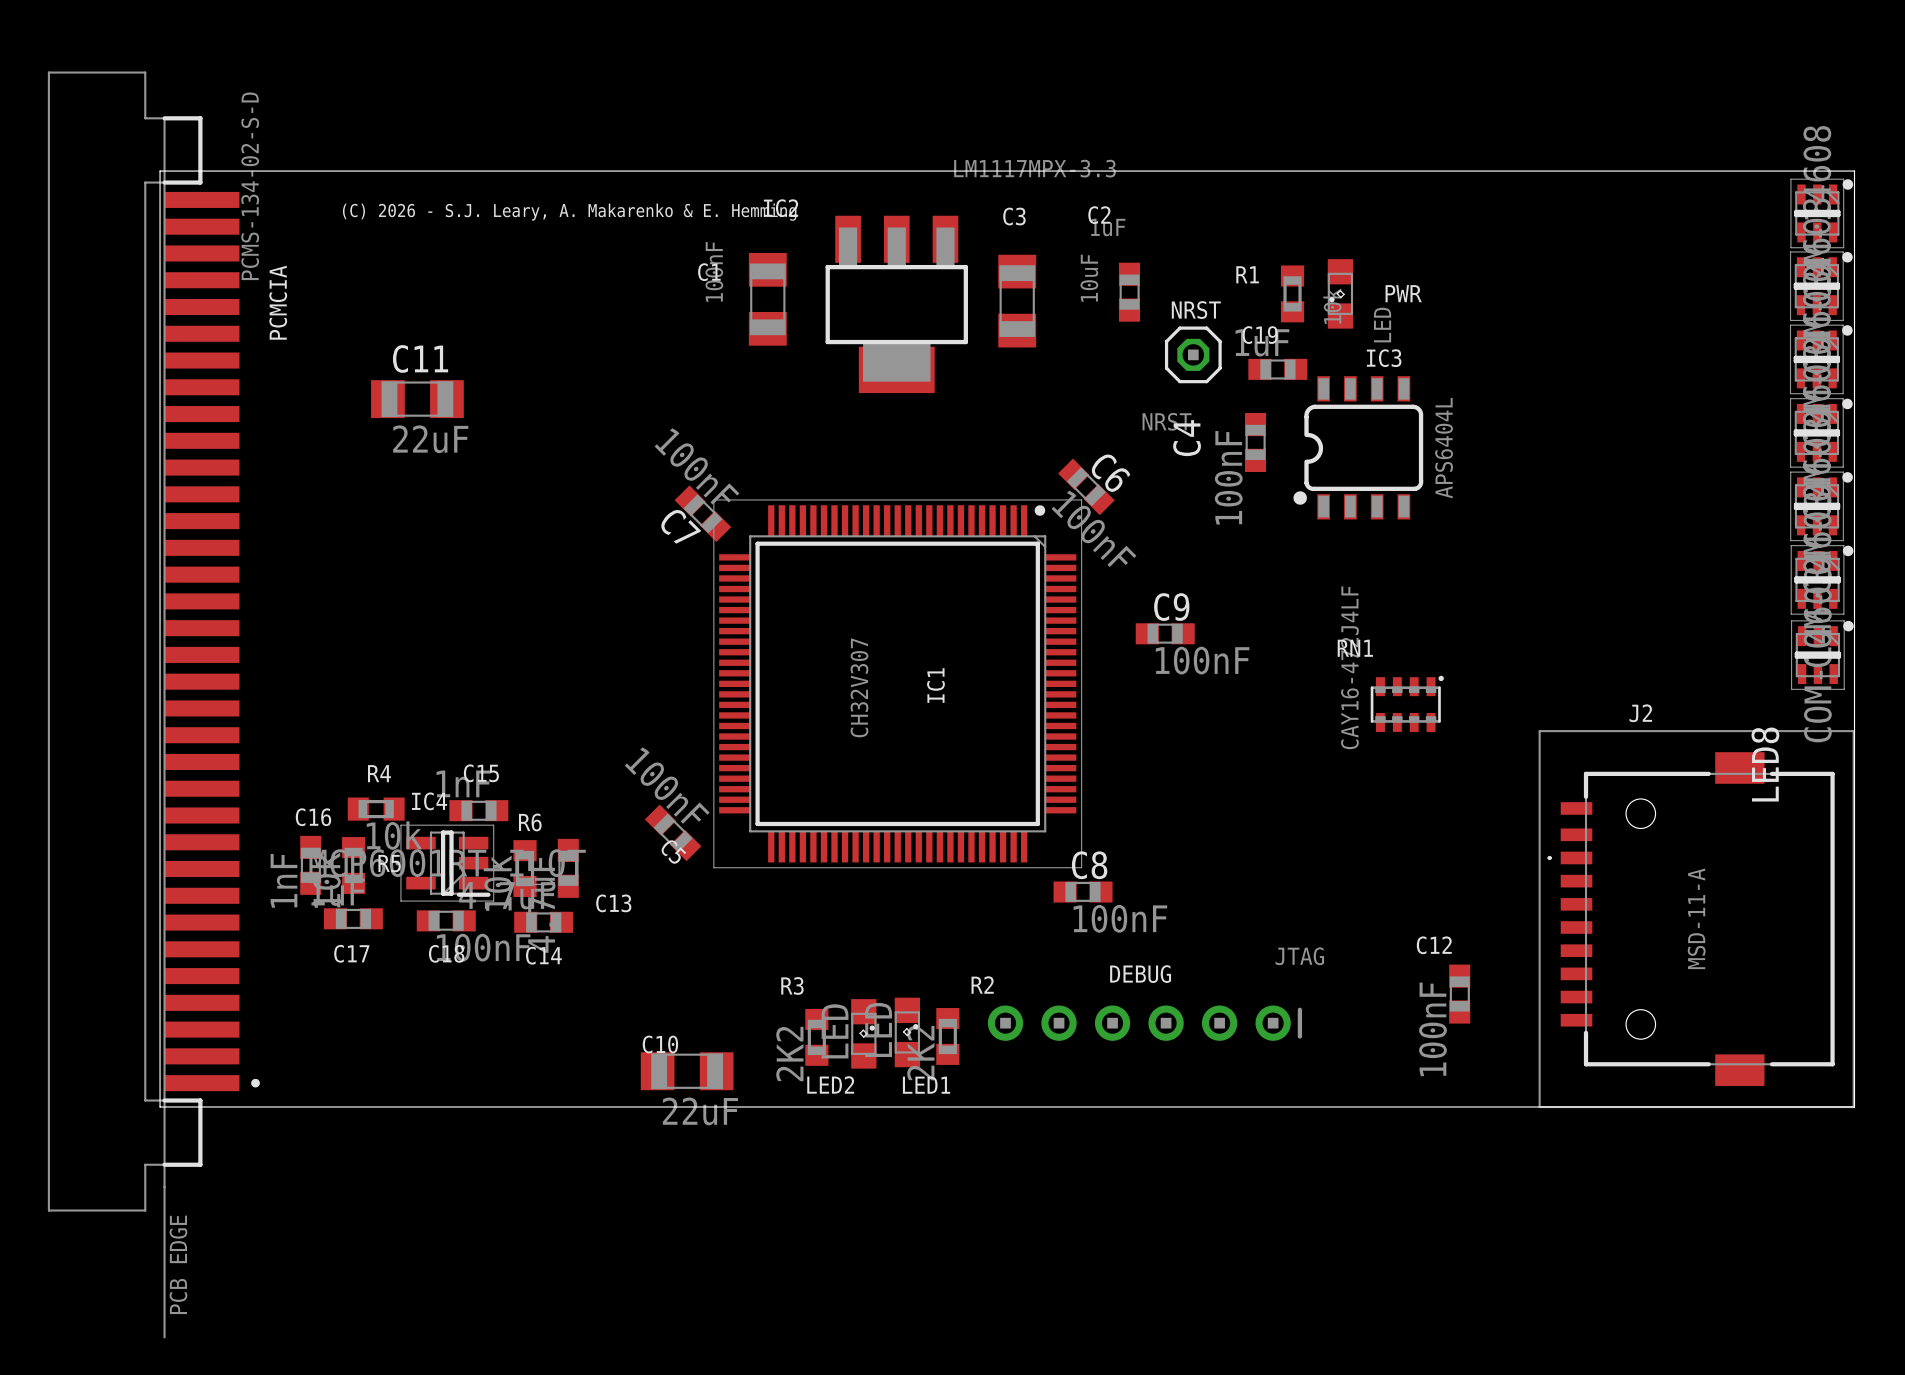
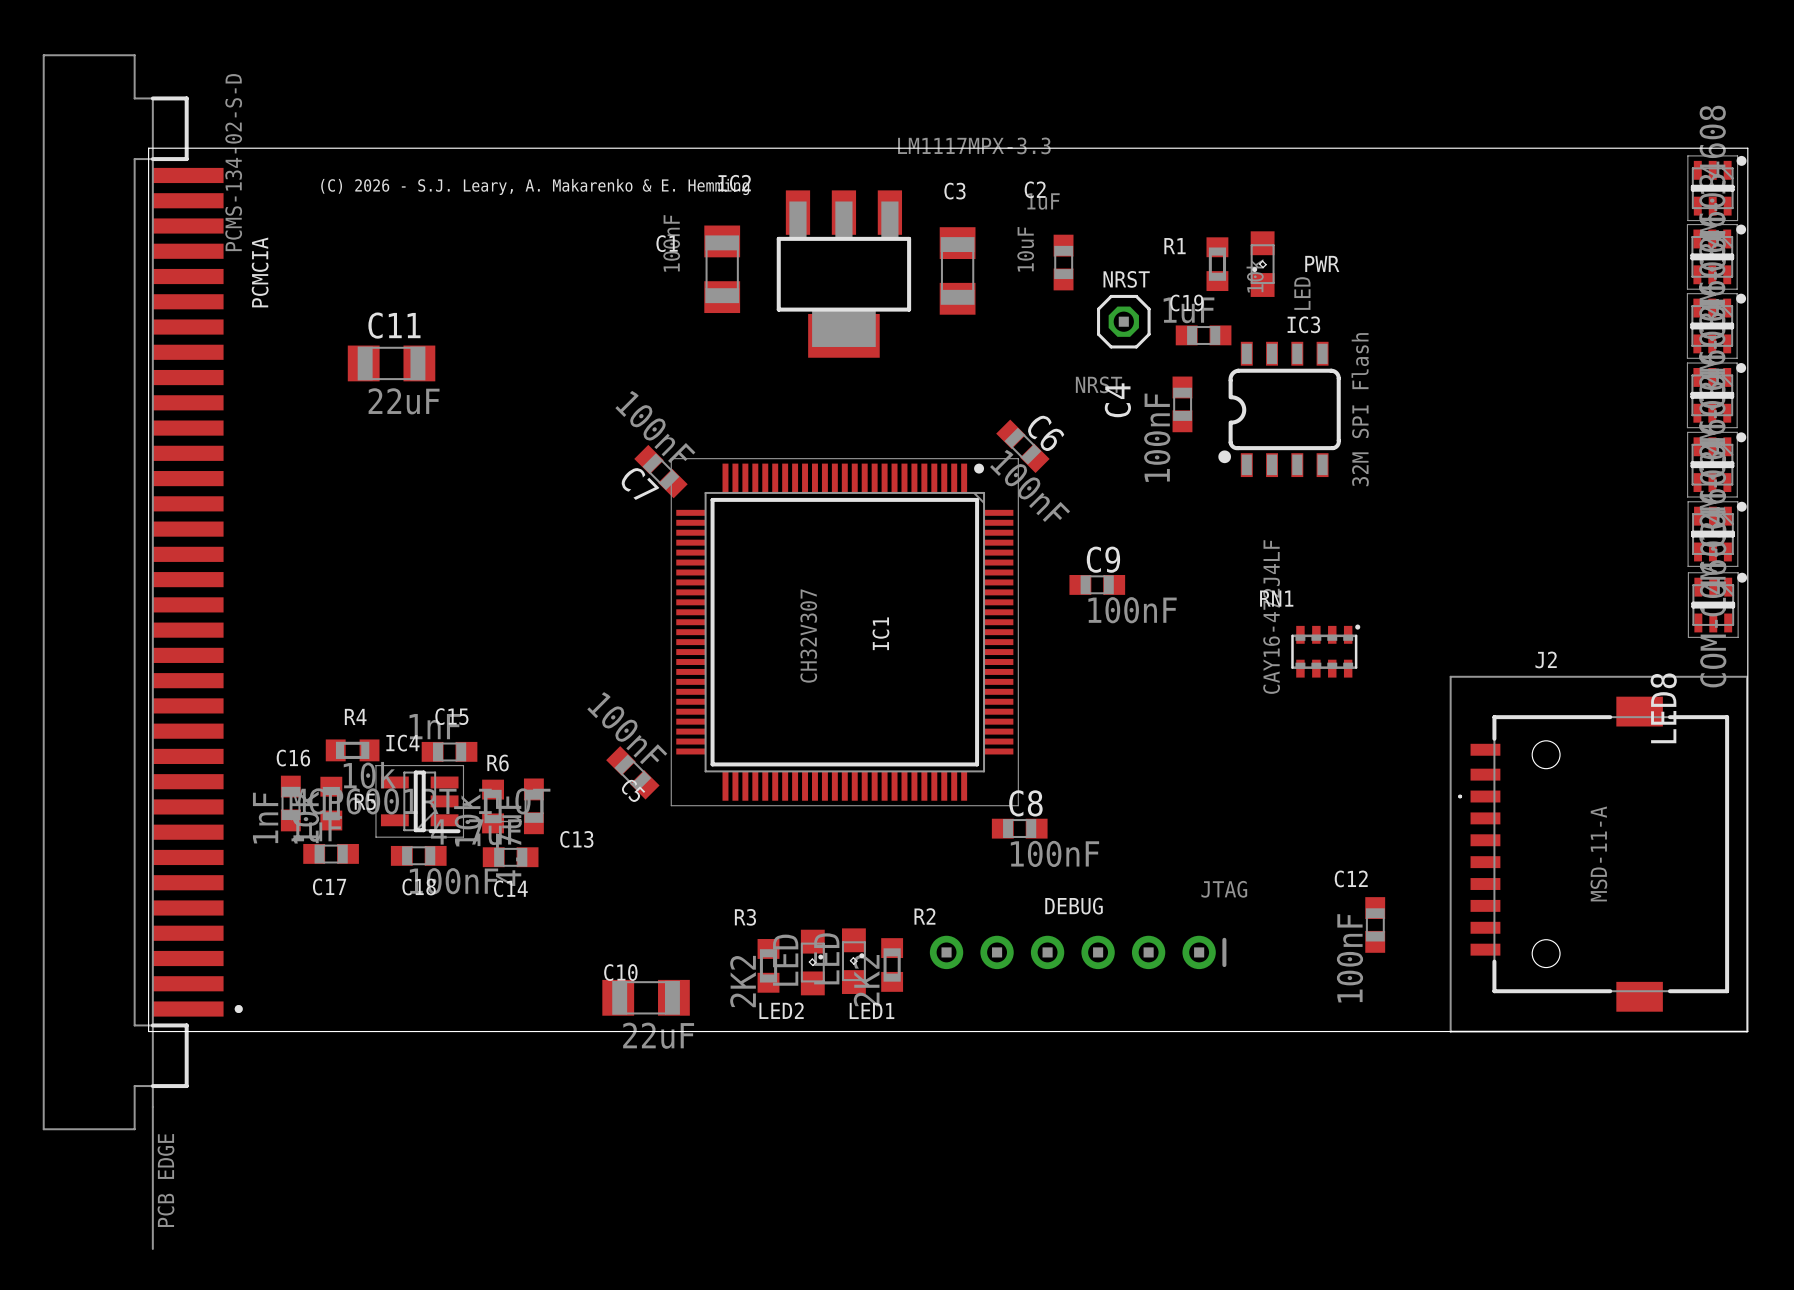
IC3 value: APS6404L (1444, 448) -> 32M SPI Flash (1360, 409)

